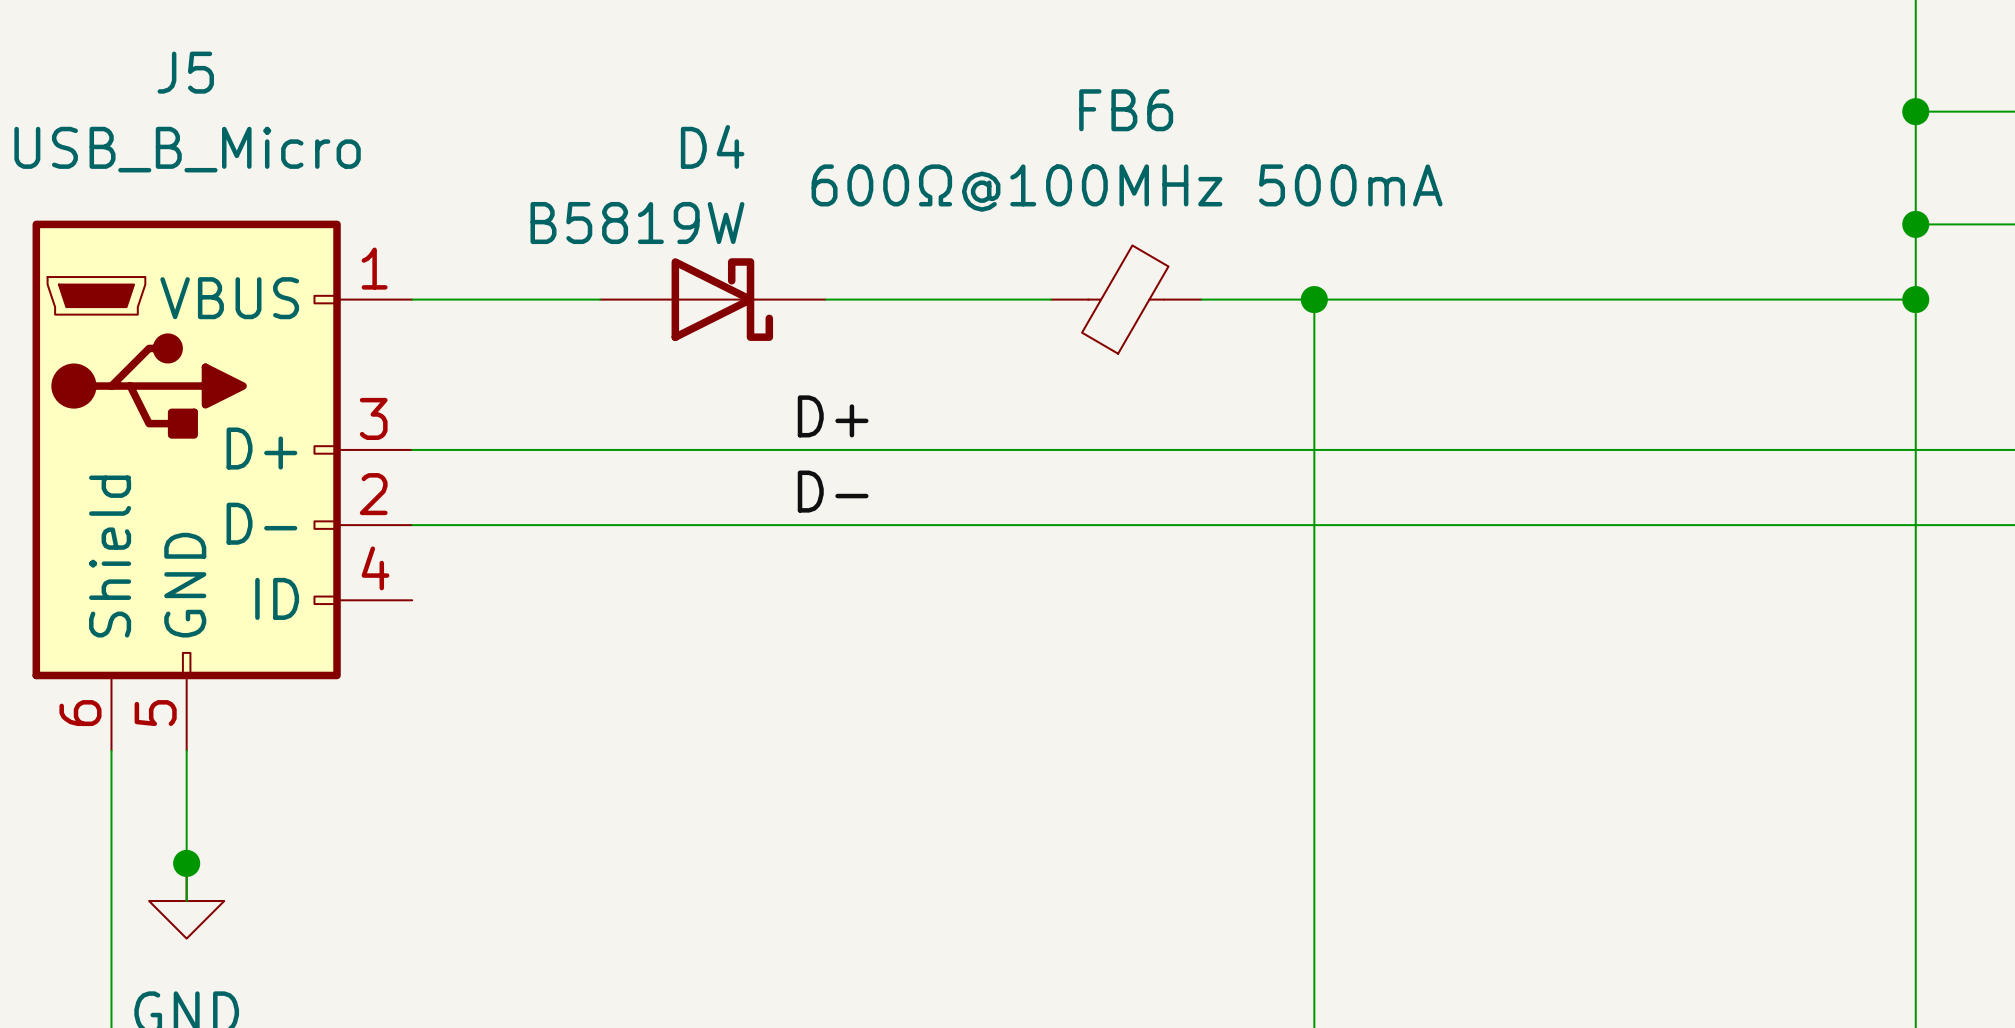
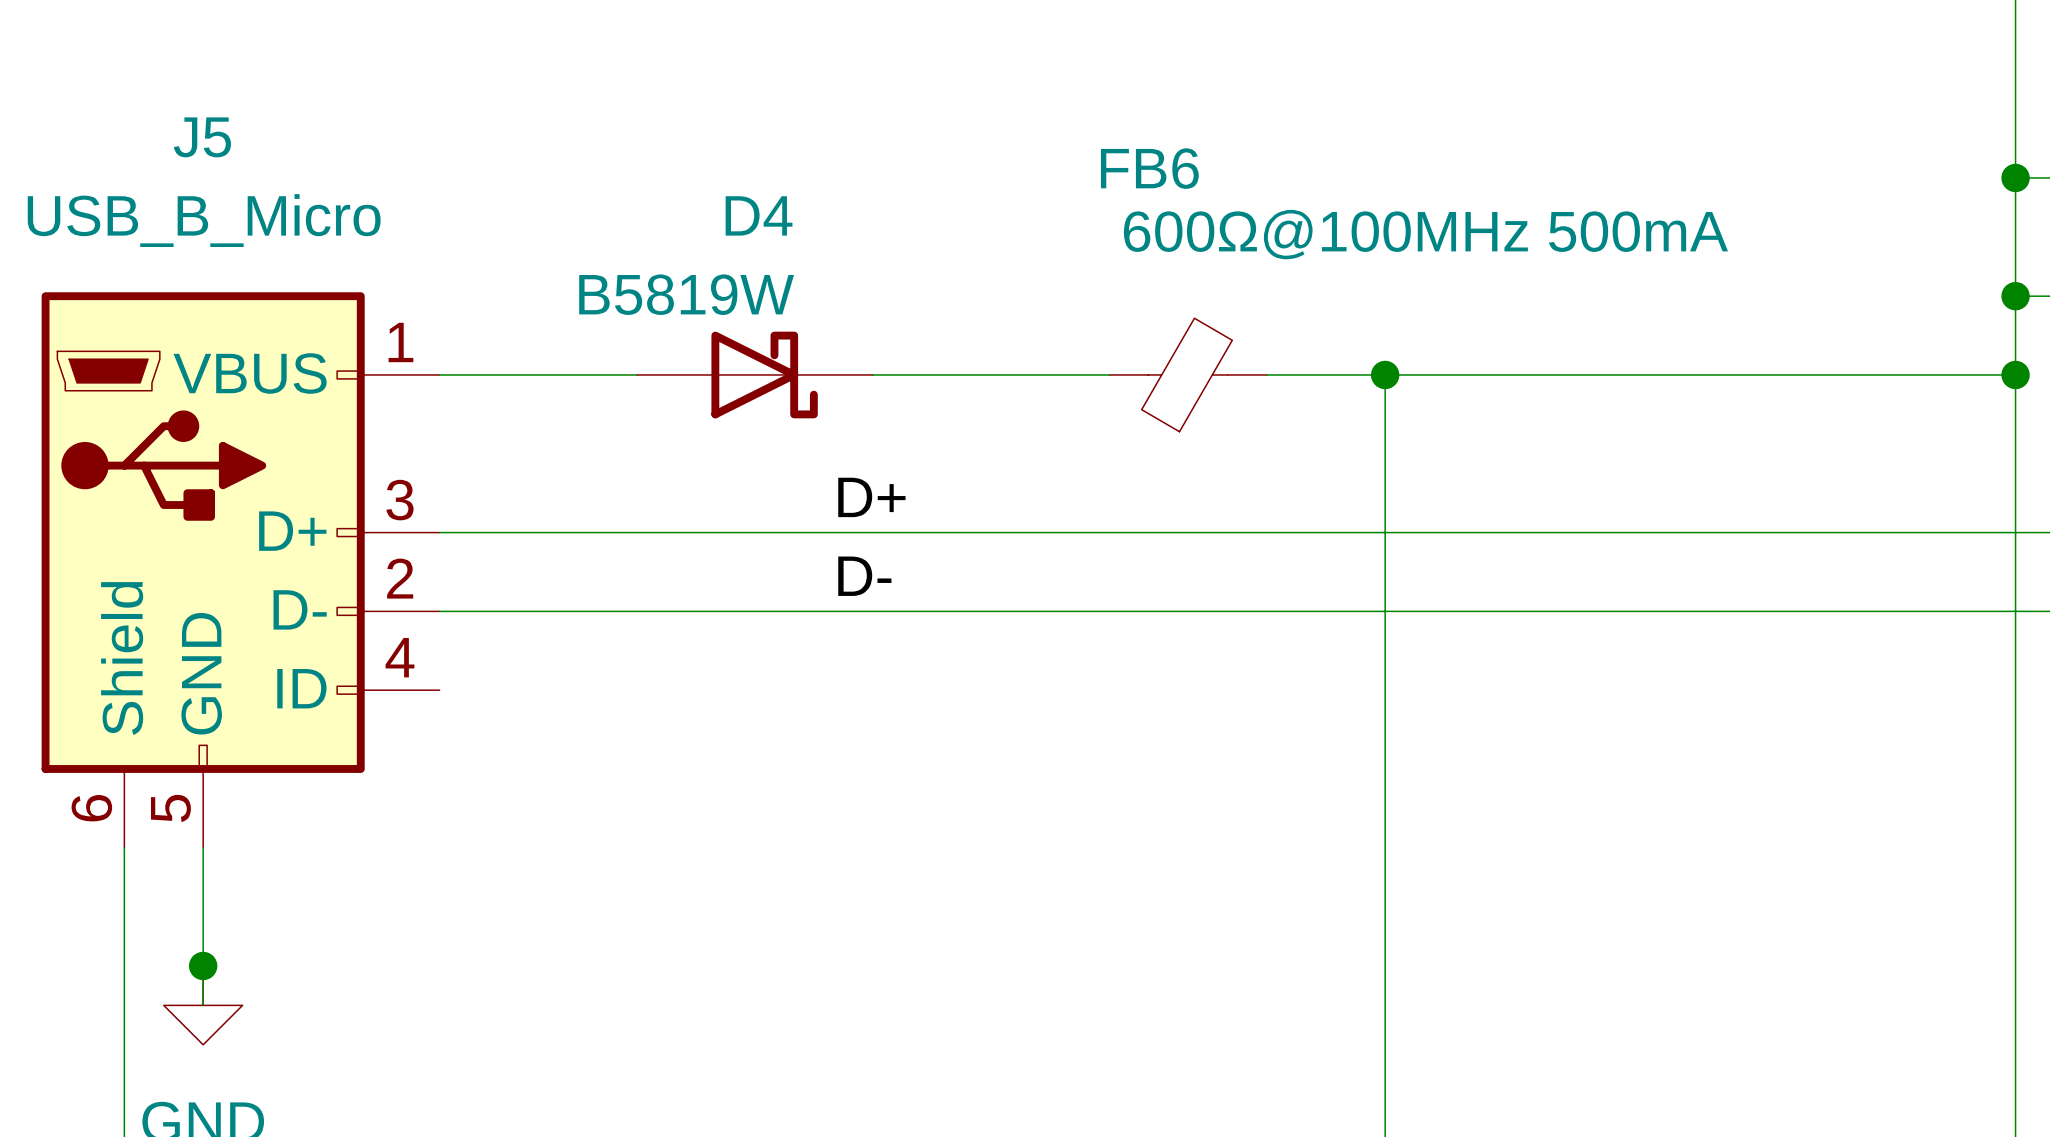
FB6 name position: FB6 (1126, 110) -> FB6 (1149, 168)
FB6 value position: 600Ω@100MHz 500mA (1127, 188) -> 600Ω@100MHz 500mA (1425, 234)

